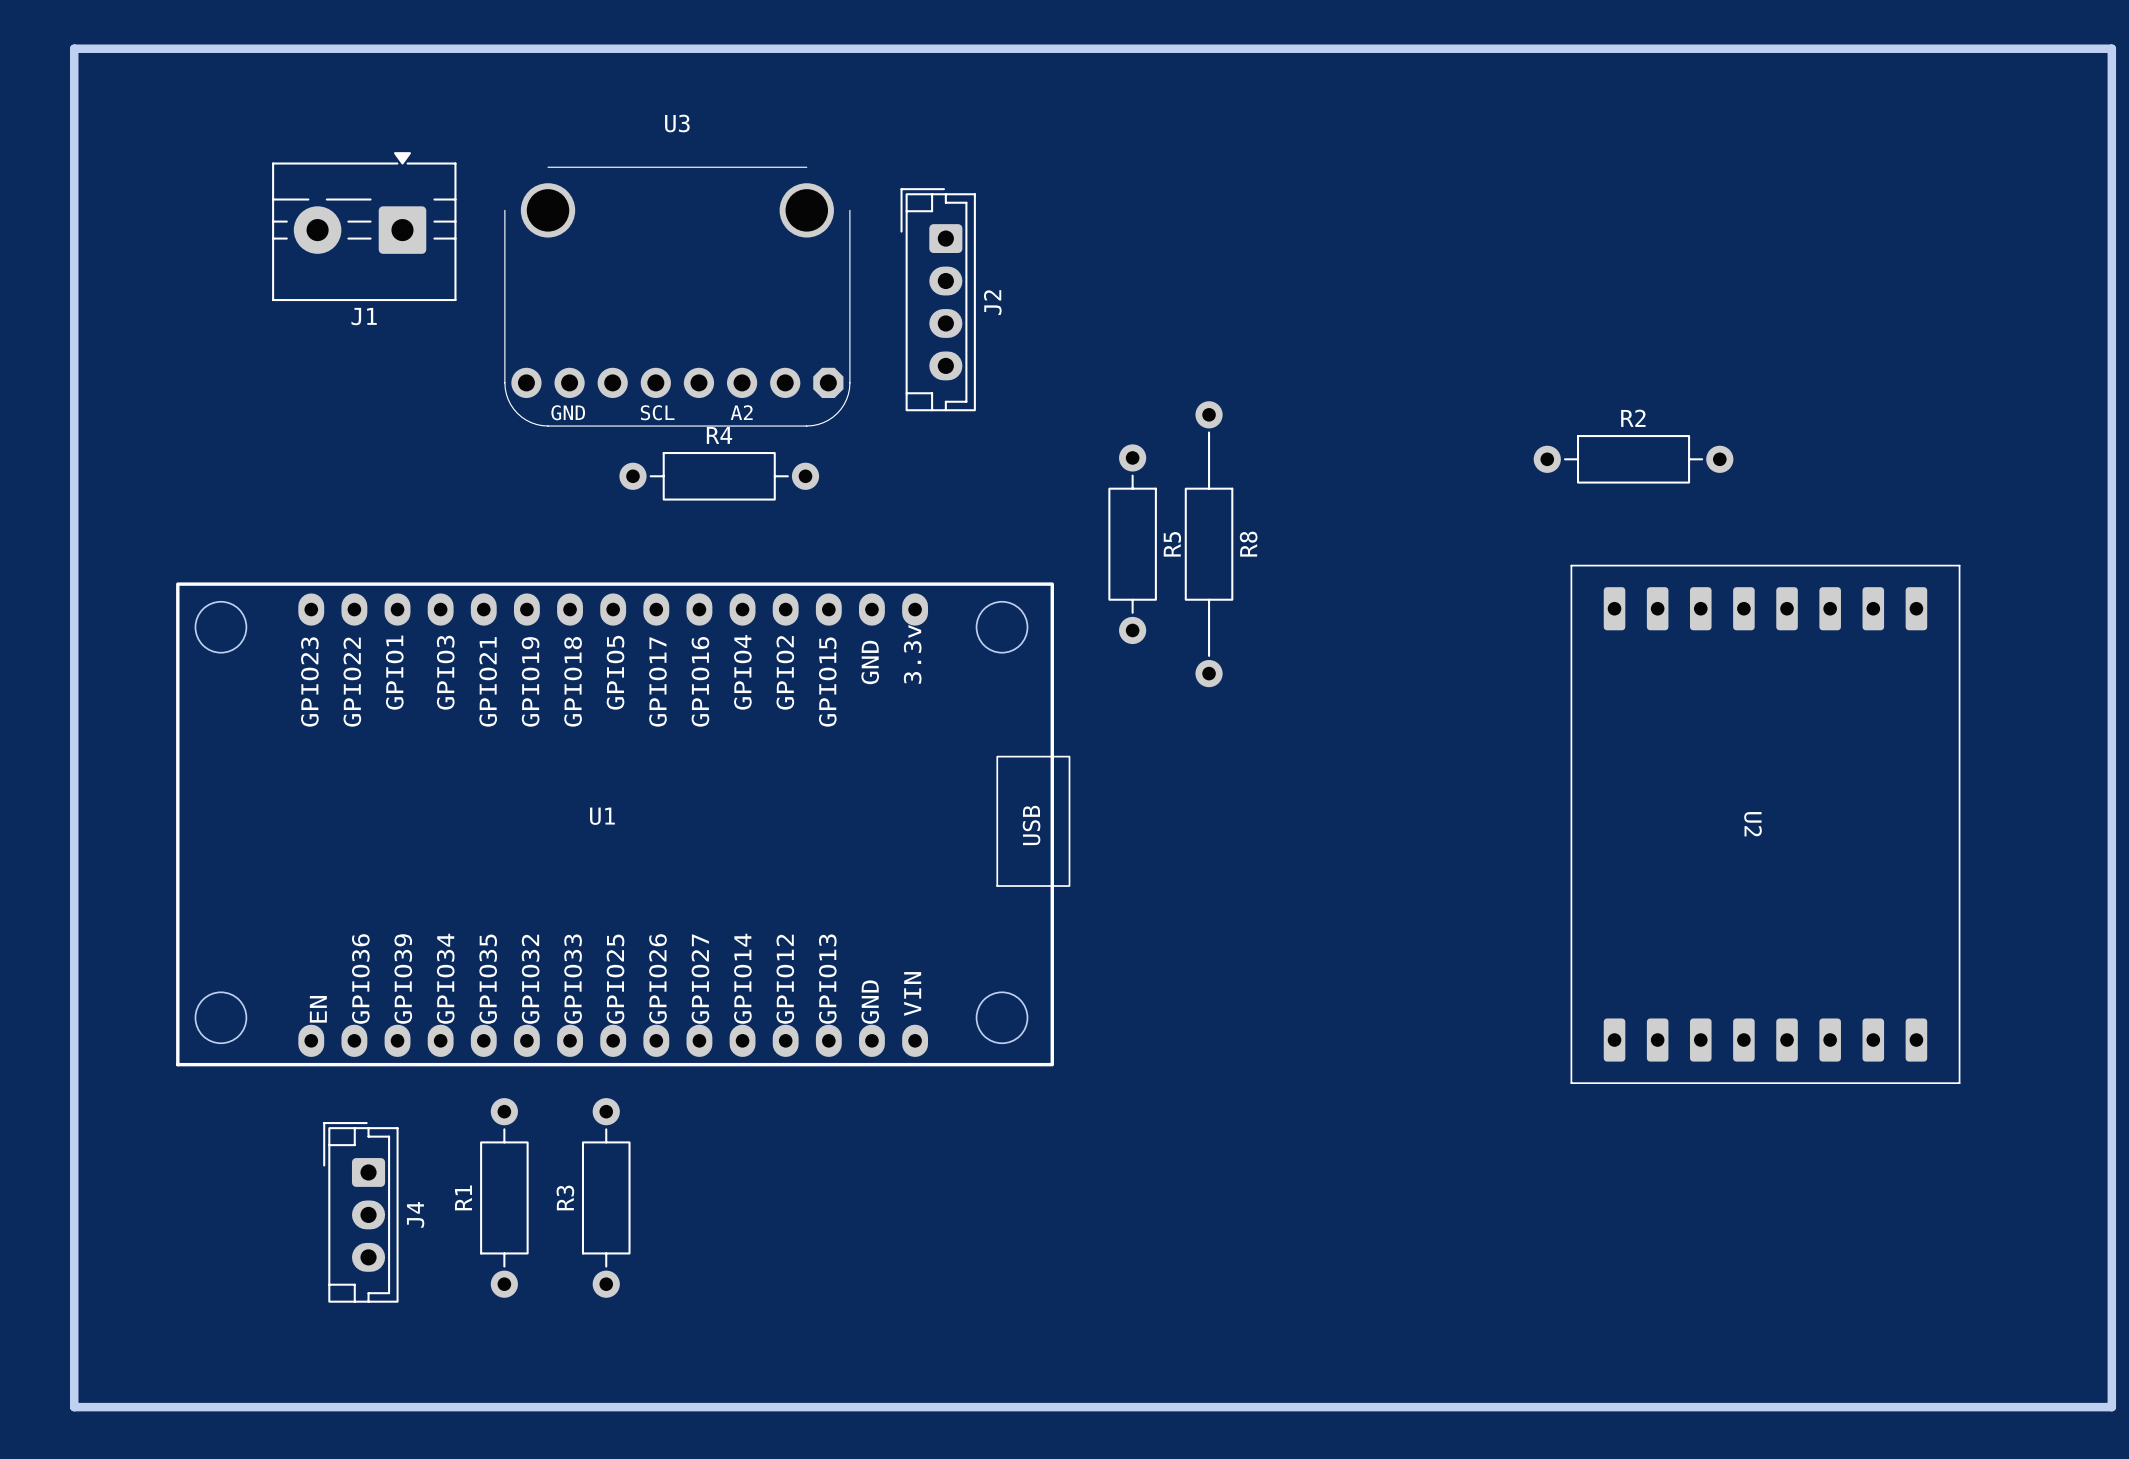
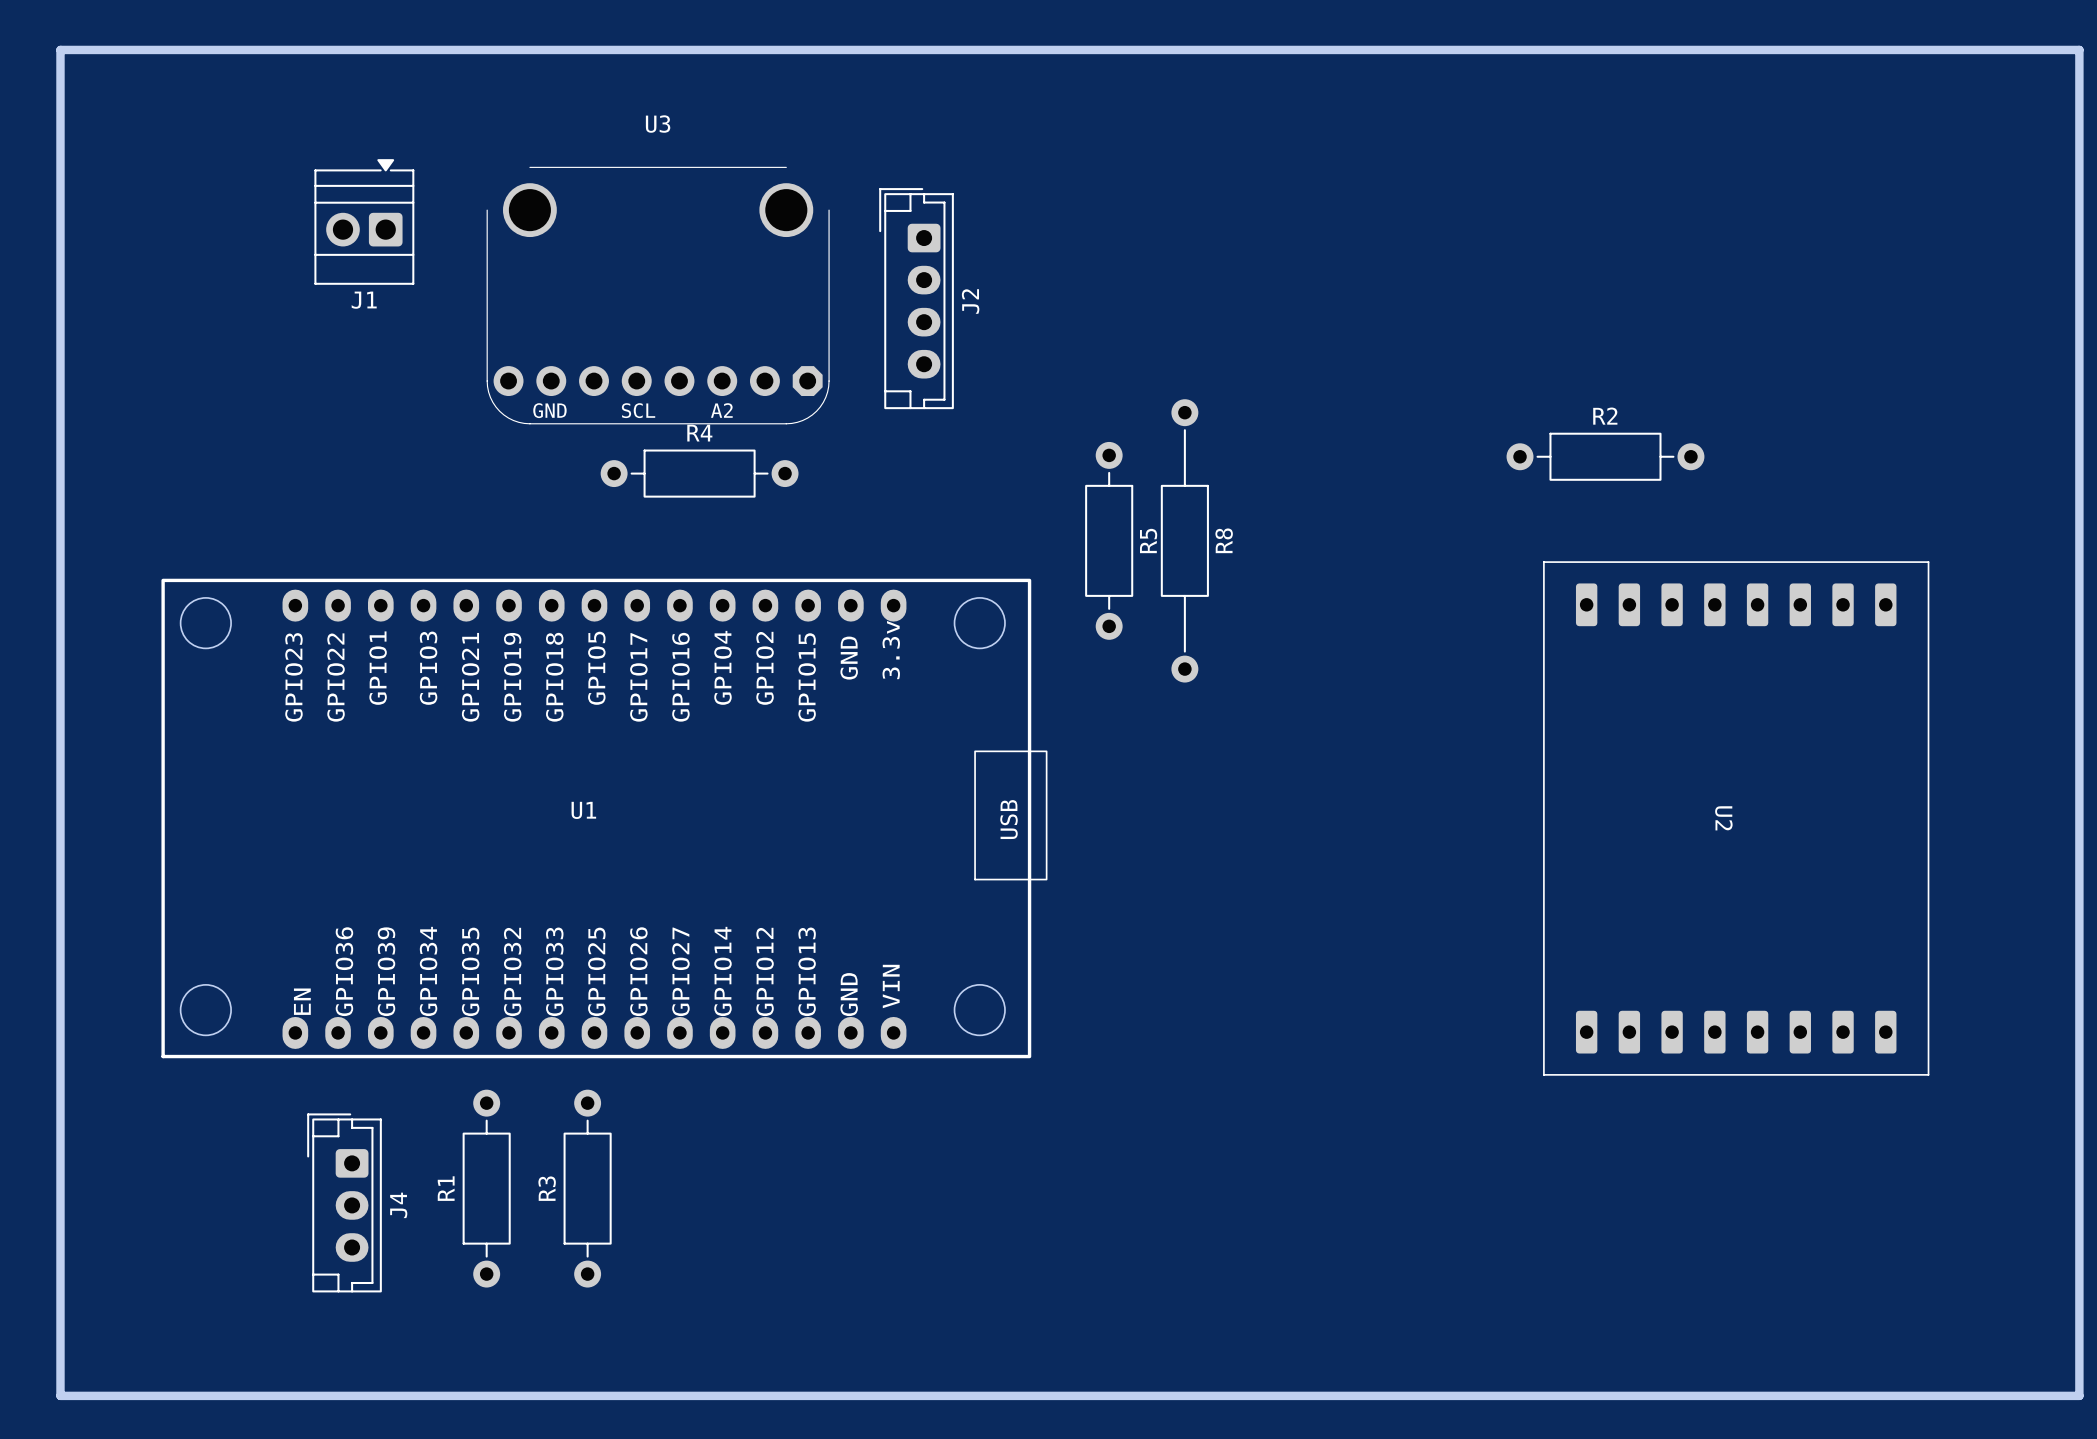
J1 footprint: [272, 152, 457, 302] -> [314, 159, 415, 285]

